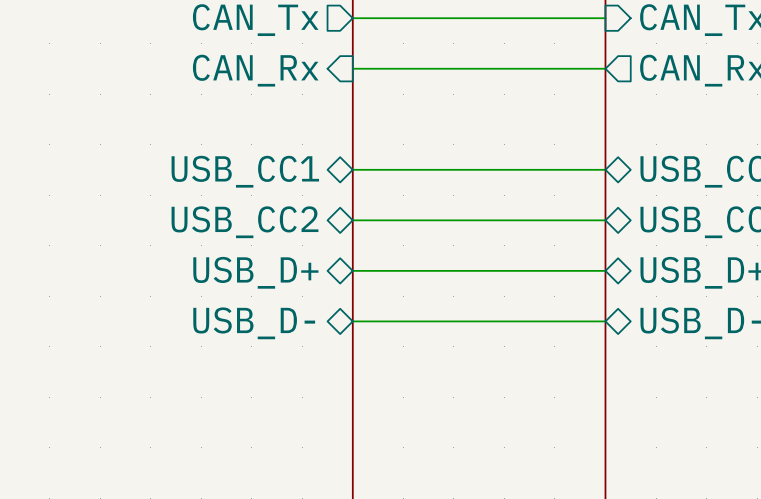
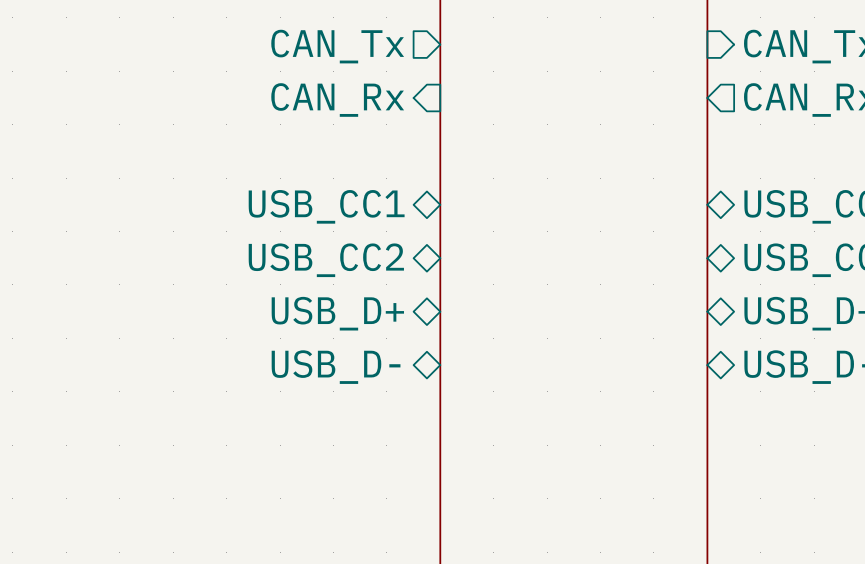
wire: (352, 18) (605, 18) -> none
wire: (352, 68) (605, 68) -> none
wire: (352, 169) (605, 169) -> none
wire: (352, 220) (605, 220) -> none
wire: (352, 270) (605, 270) -> none
wire: (352, 321) (605, 321) -> none

